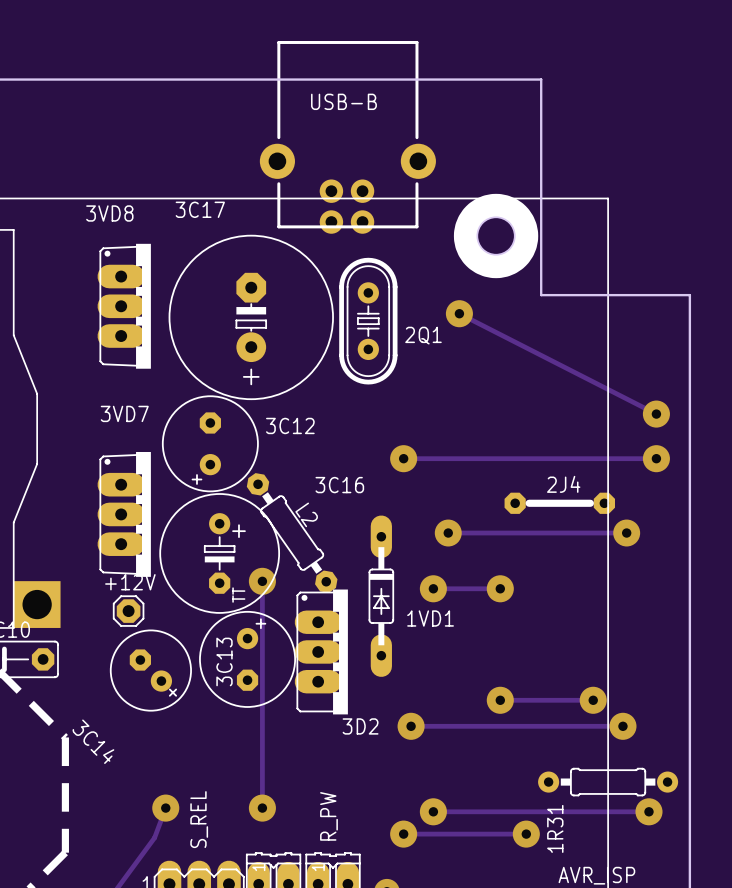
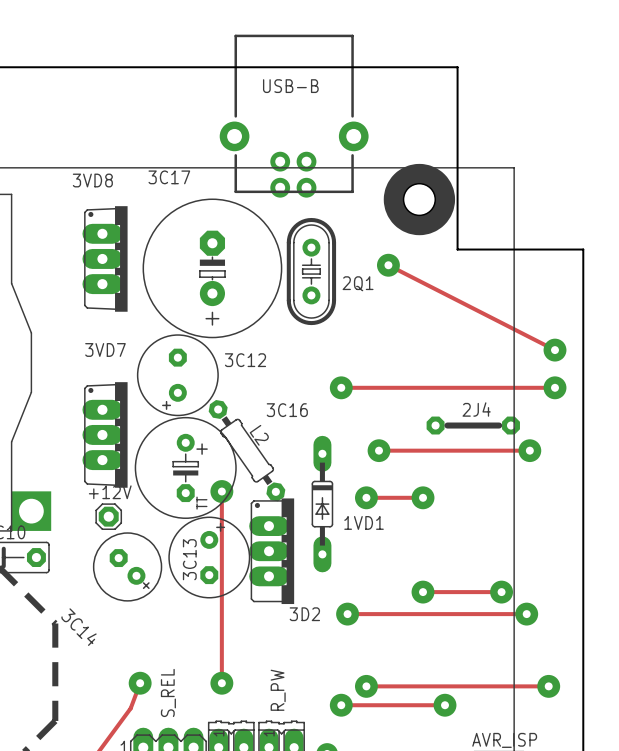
1R31: (608, 782) -> none

